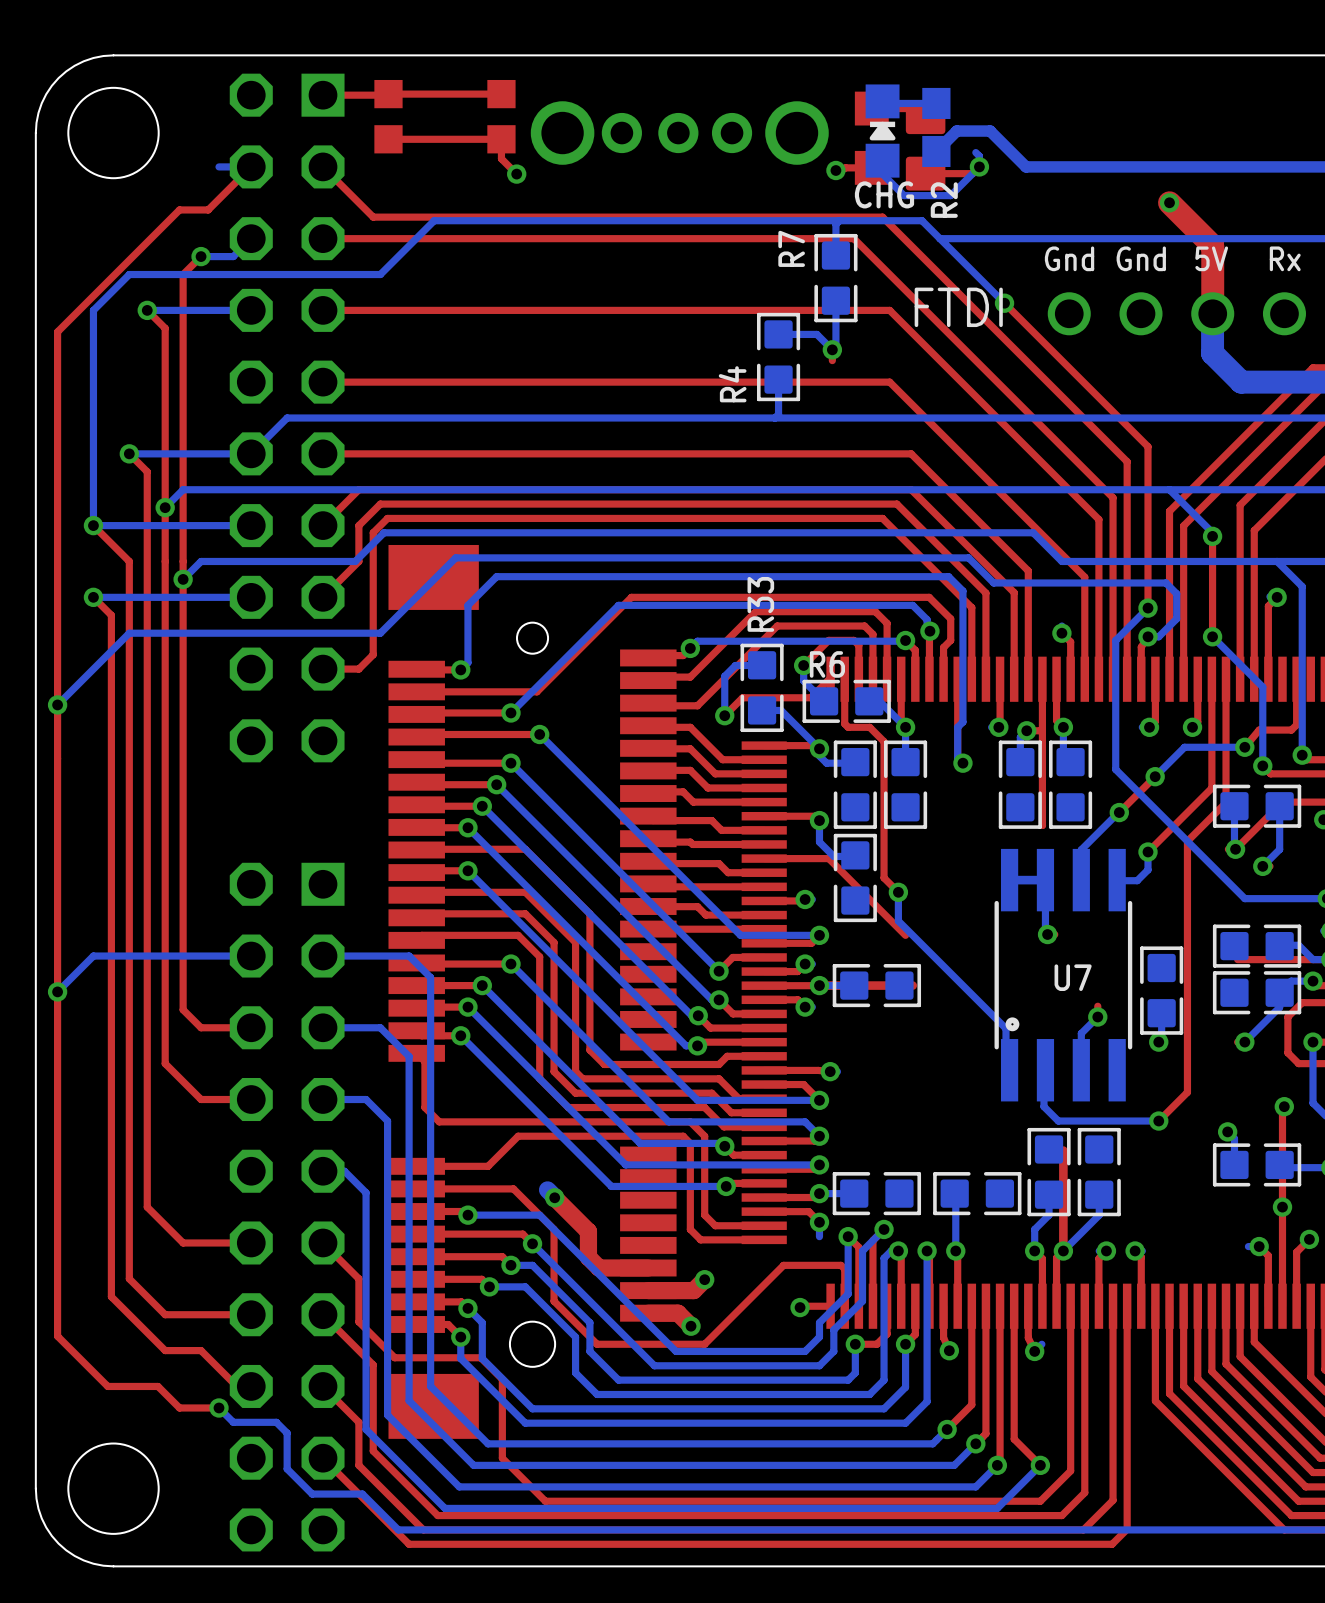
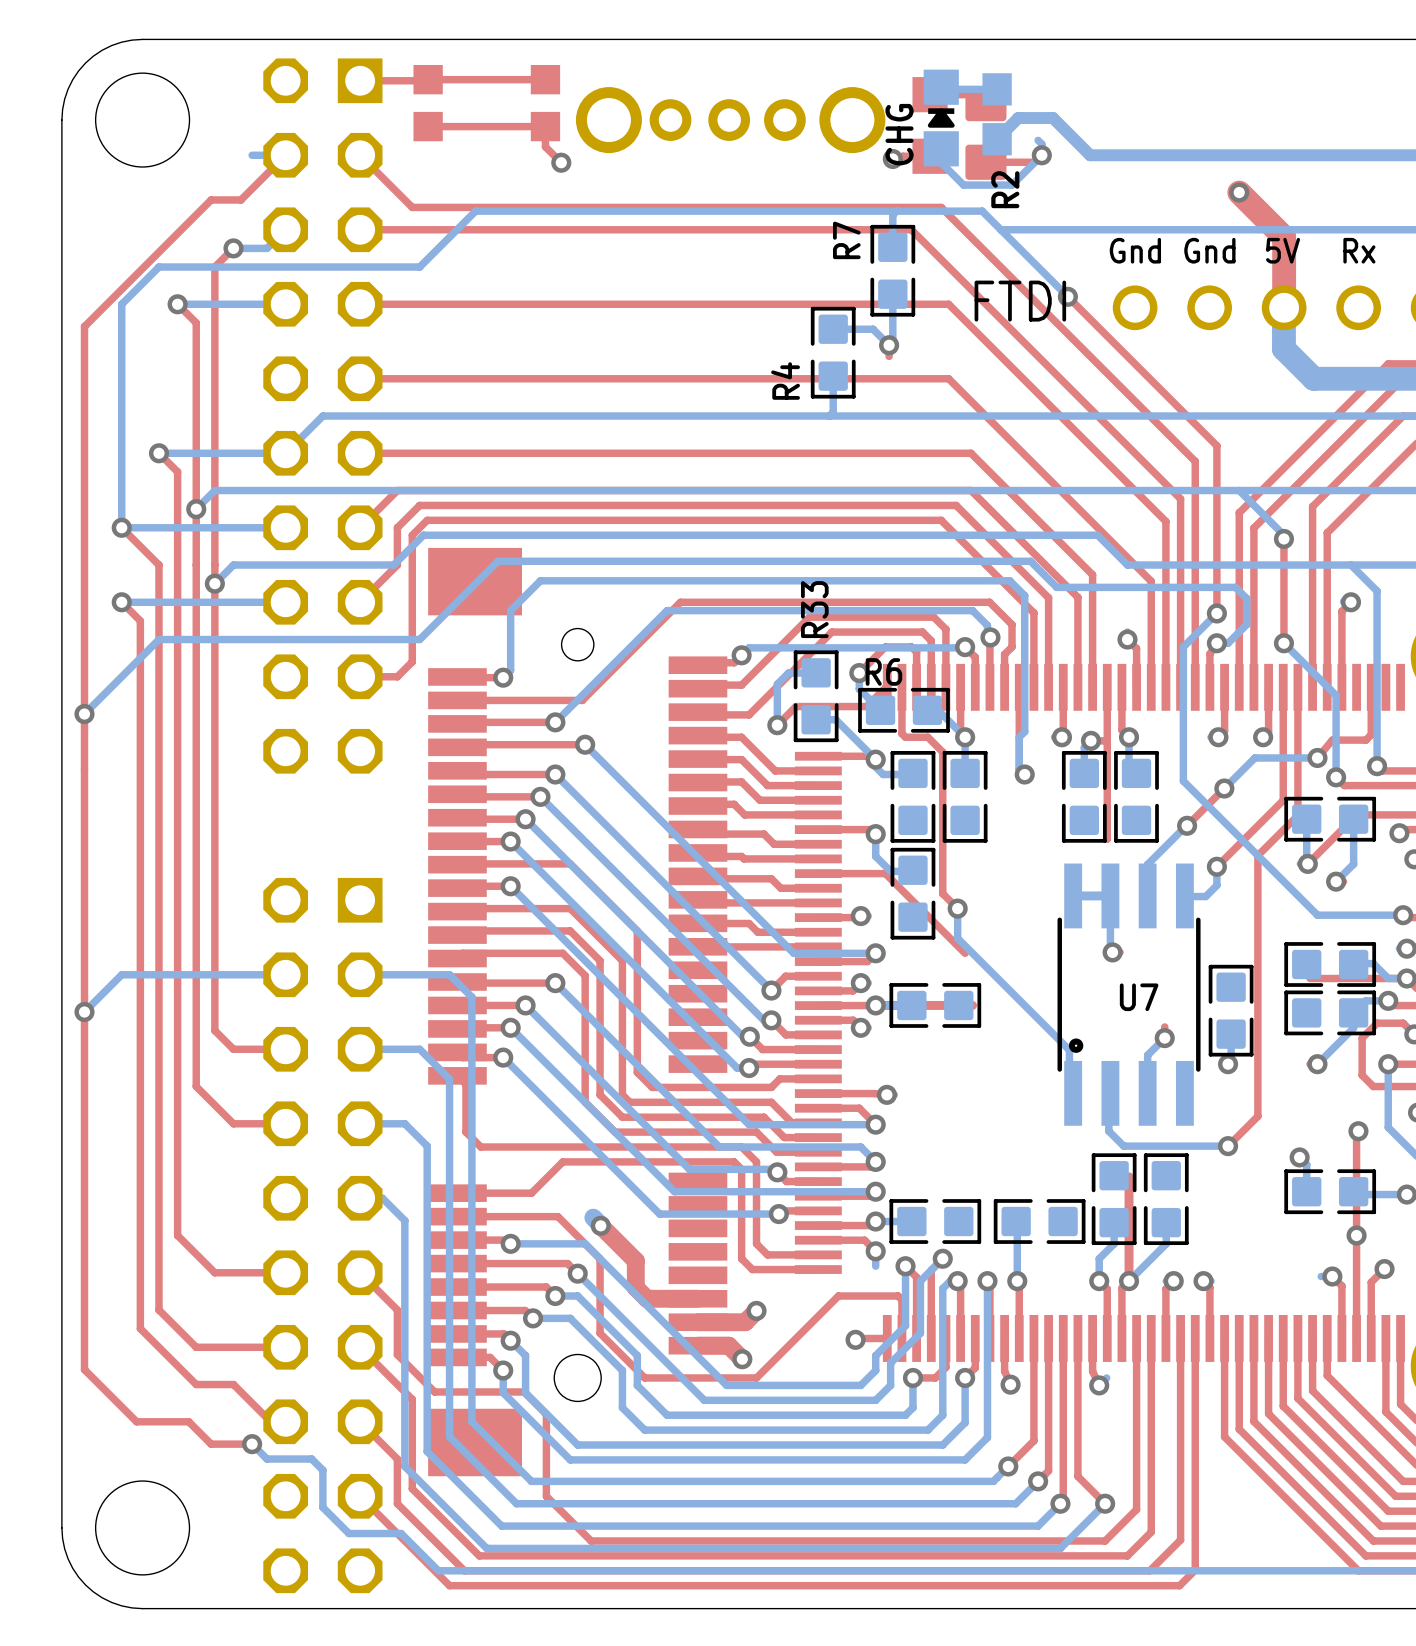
CHG name rotation: 0° (884, 194) -> 90° counterclockwise (899, 134)

